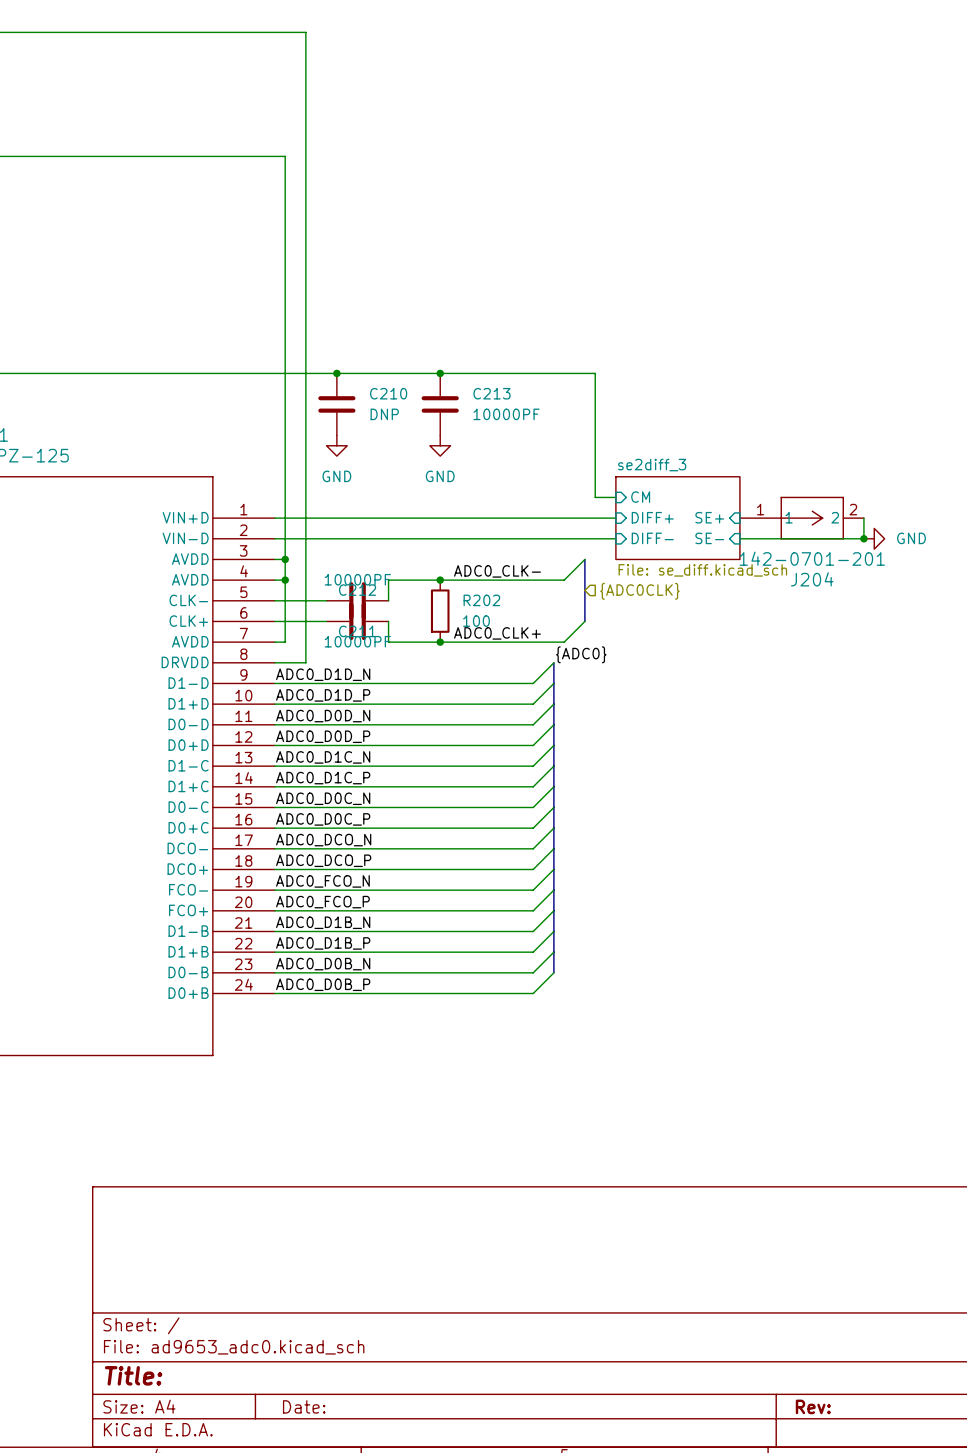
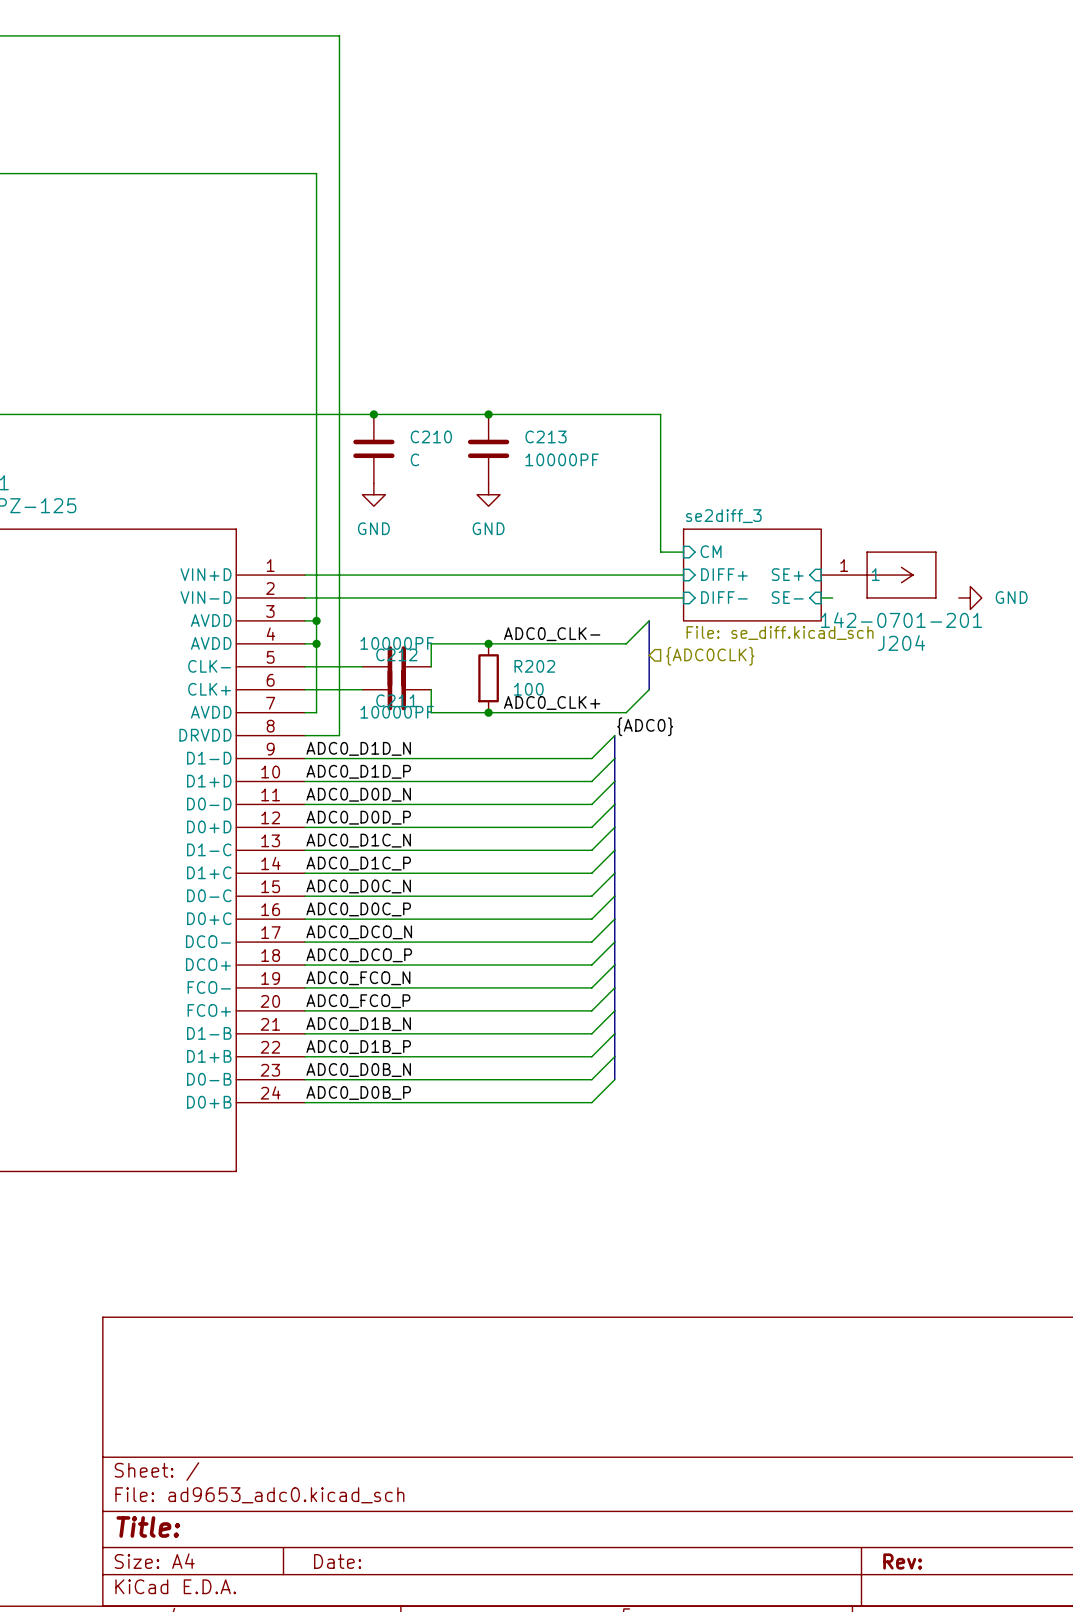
C210 value: DNP (384, 414) -> C (414, 459)
J204 symbol: [739, 496, 864, 540] -> [821, 551, 937, 599]
wire: (863, 518) (863, 538) (750, 538) -> none
junction: (863, 538) -> none

